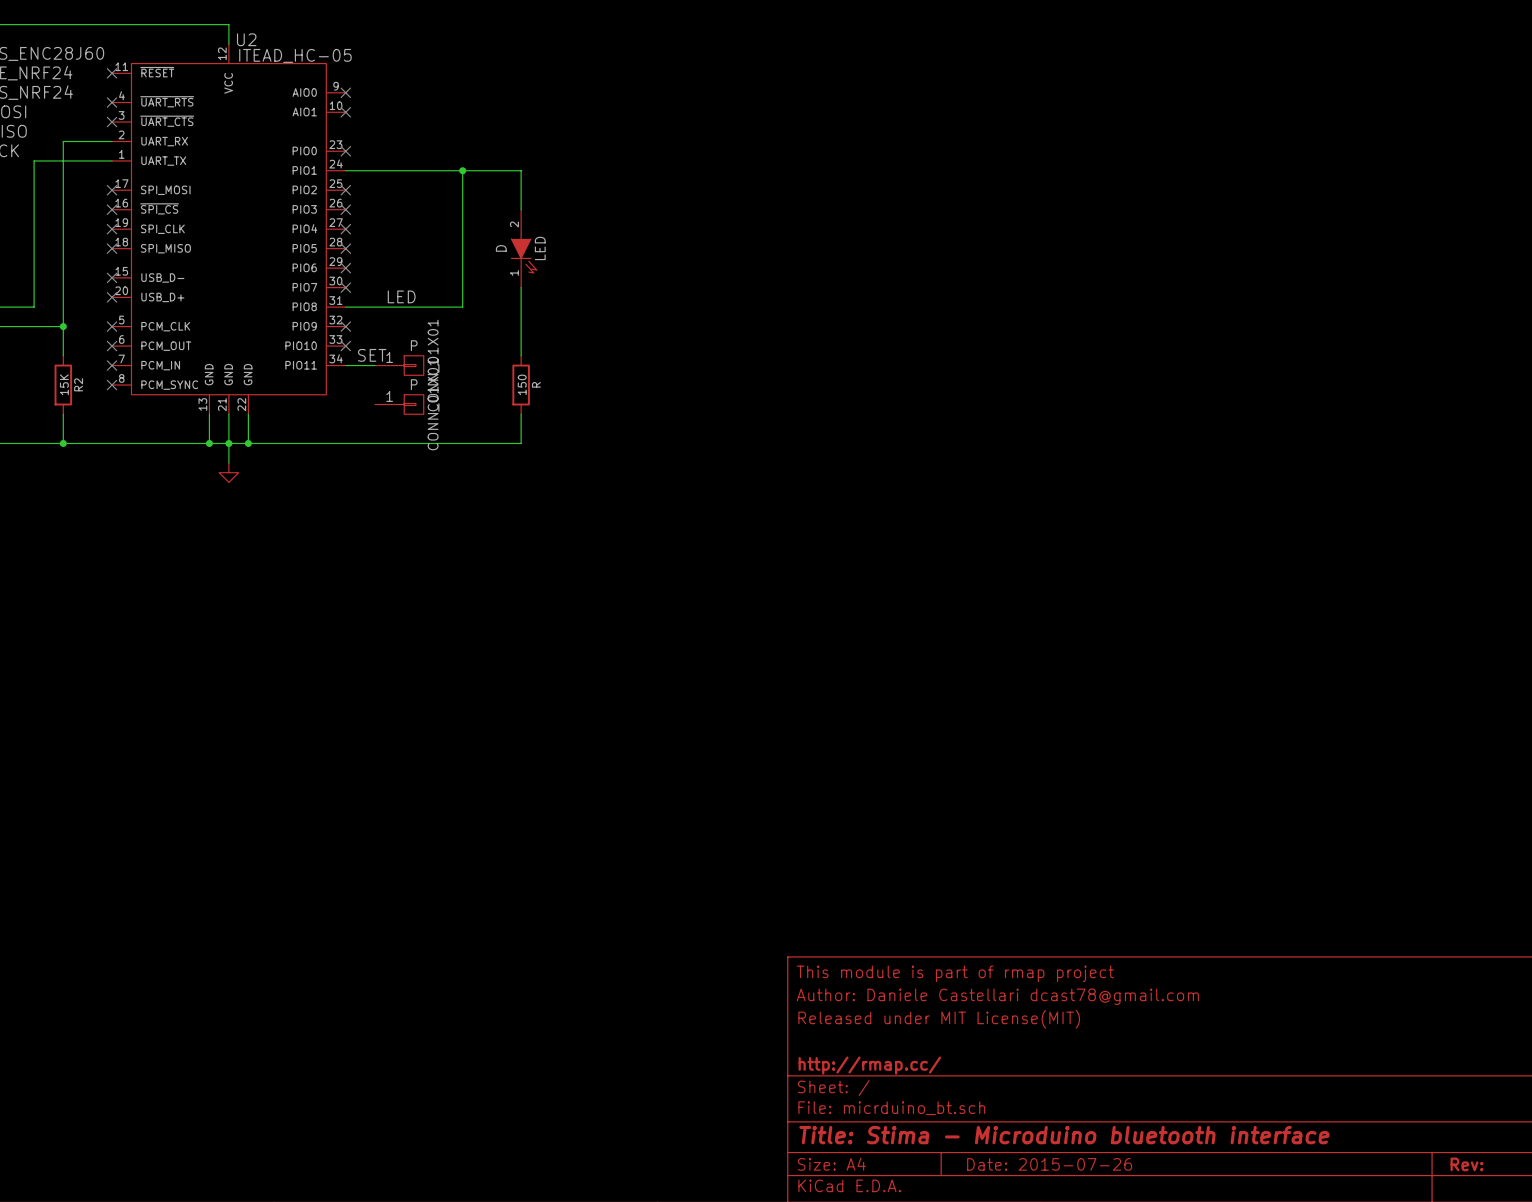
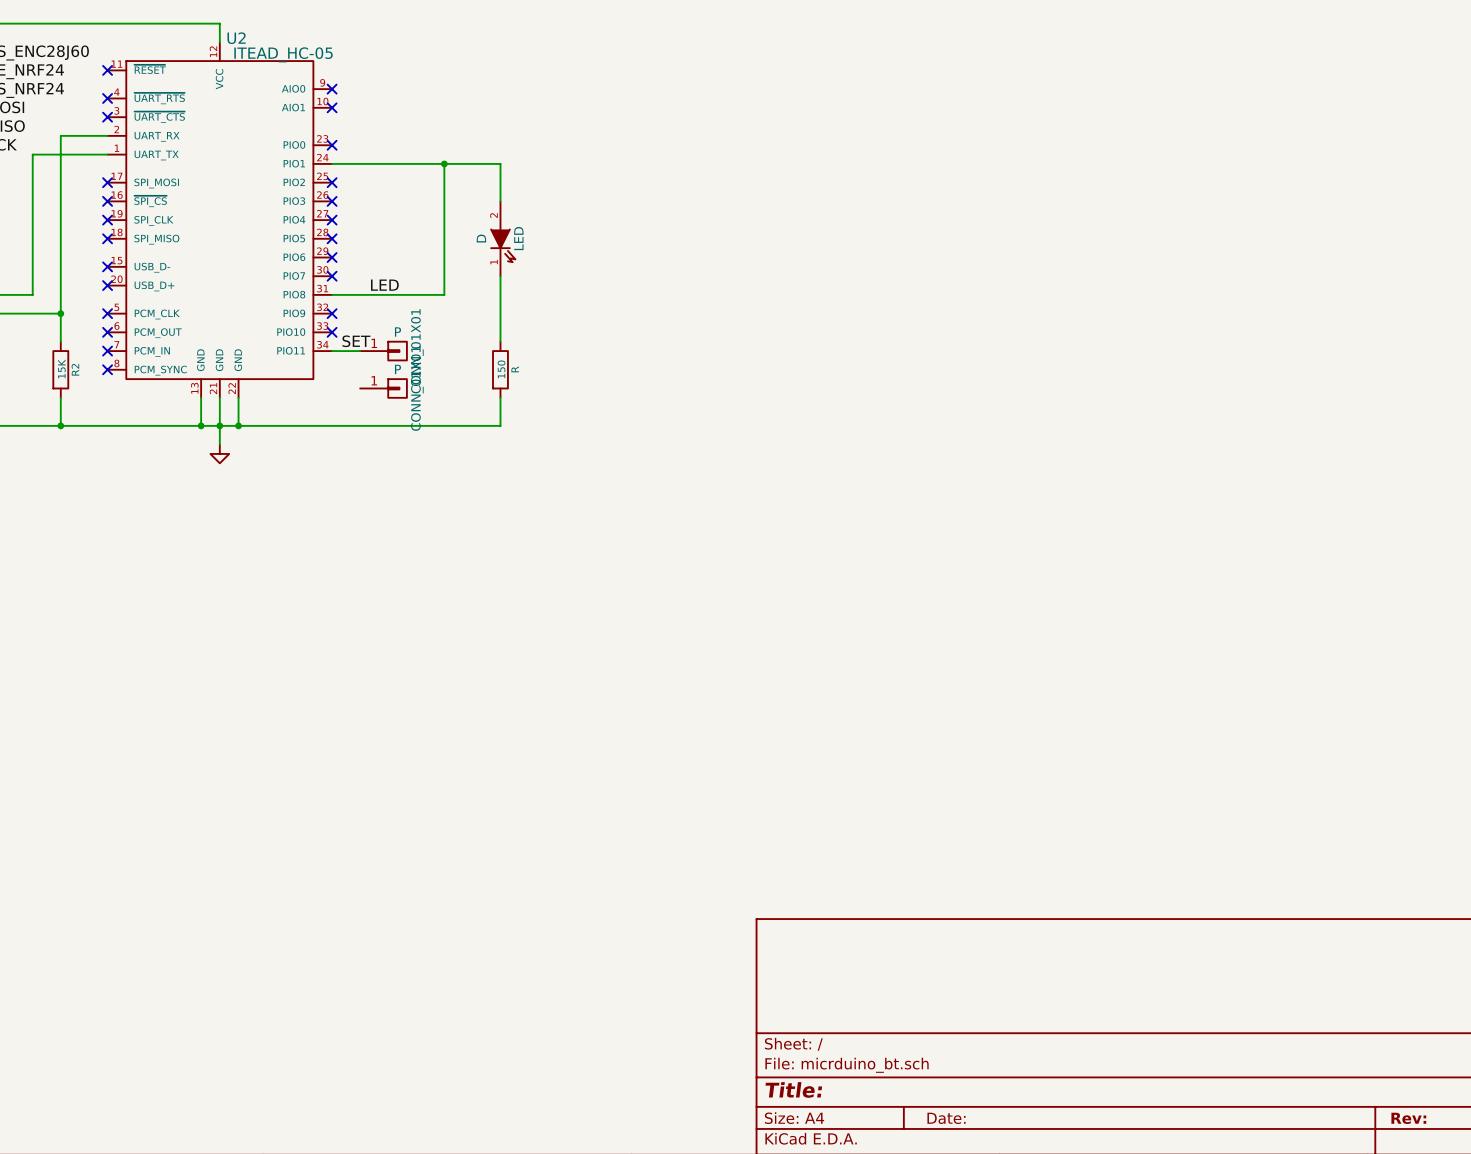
title block: This module is part of rmap project (955, 973) -> none
title block: Author: Daniele Castellari dcast78@gmail.com (997, 996) -> none
title block: Released under MIT License(MIT) (939, 1019) -> none
title block: http://rmap.cc/ (869, 1065) -> none
title block: Title: Stima - Microduino bluetooth interface (1064, 1135) -> Title: (793, 1089)
title block: Date: 2015-07-26 (1049, 1164) -> Date: (946, 1118)

